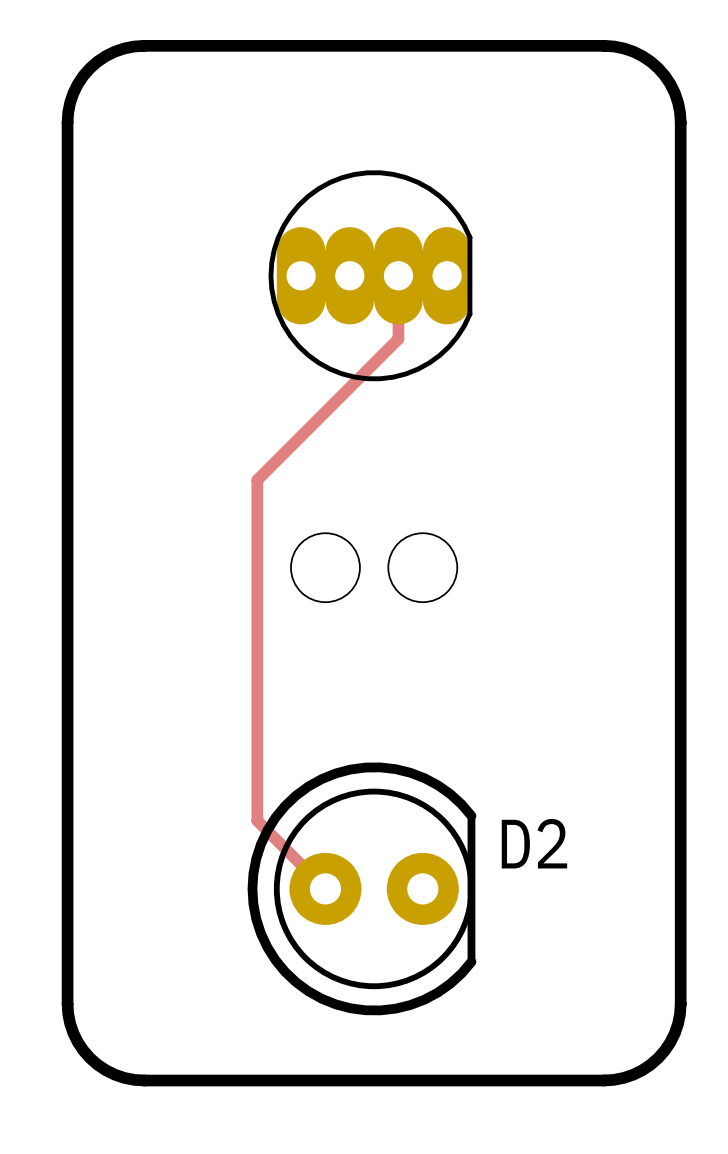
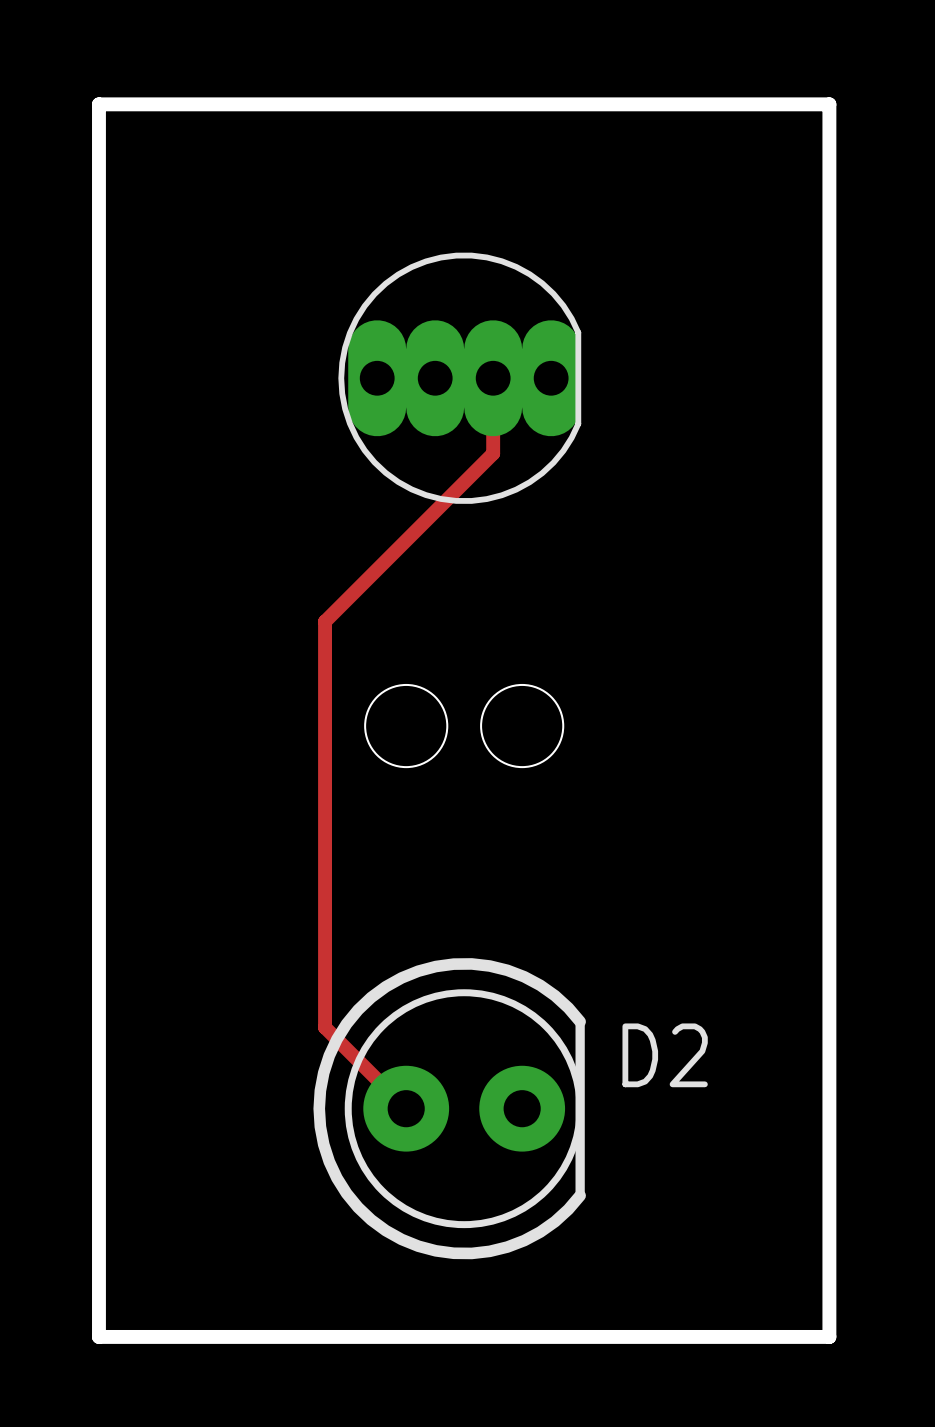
board edge: (144, 45) (114, 51) (90, 68) (73, 93) (67, 122) -> (190, 104) (98, 104) (98, 195)
board edge: (604, 45) (633, 51) (658, 68) (674, 93) (680, 122) -> (738, 104) (829, 104) (829, 195)
board edge: (67, 1003) (73, 1033) (90, 1058) (114, 1074) (144, 1080) -> (98, 1245) (98, 1336) (190, 1336)
board edge: (680, 1003) (674, 1033) (658, 1058) (633, 1074) (604, 1080) -> (829, 1245) (829, 1336) (738, 1336)

